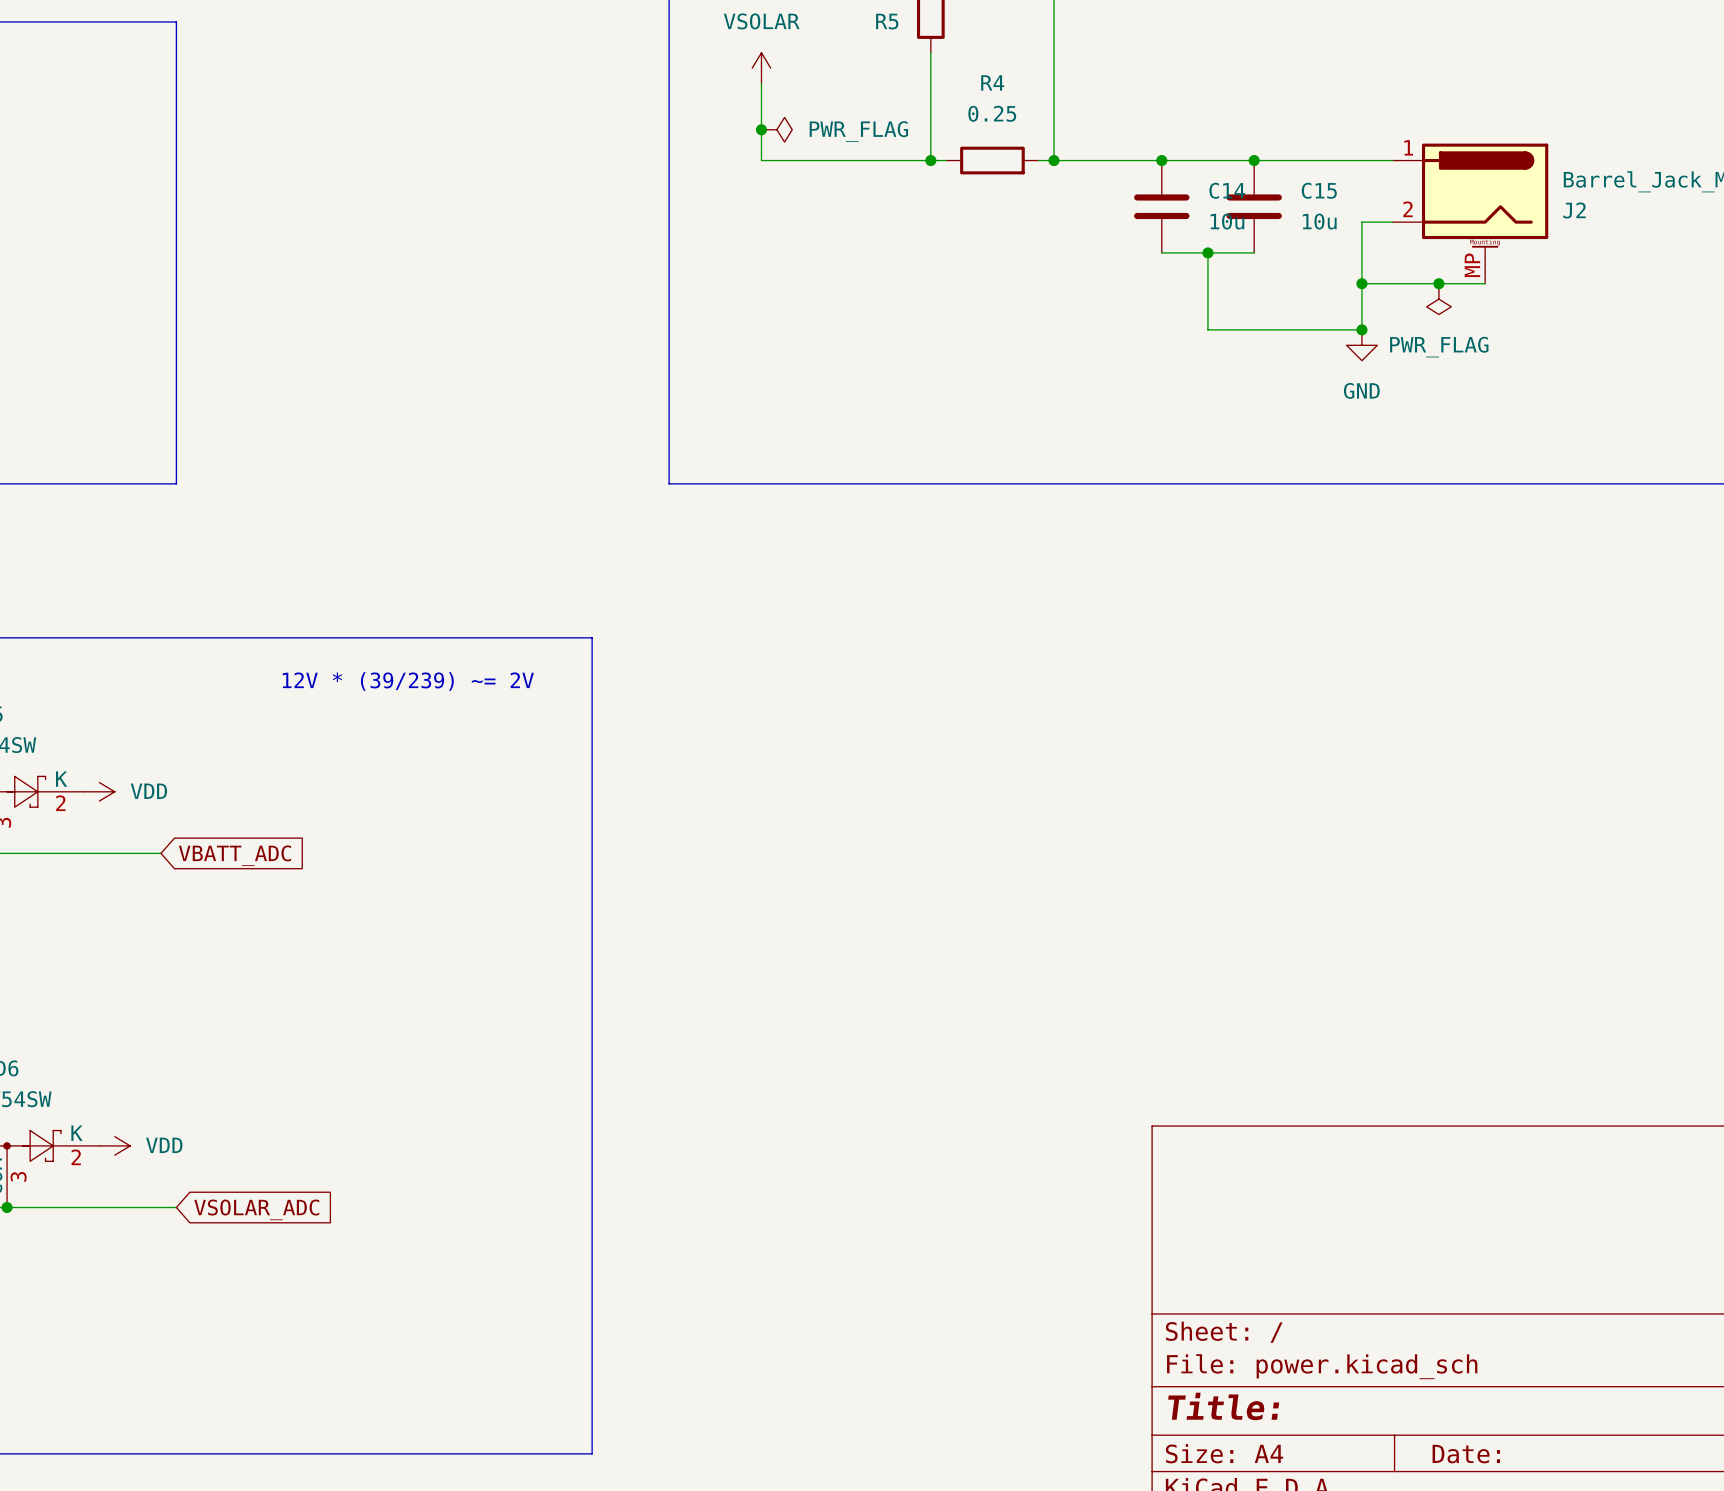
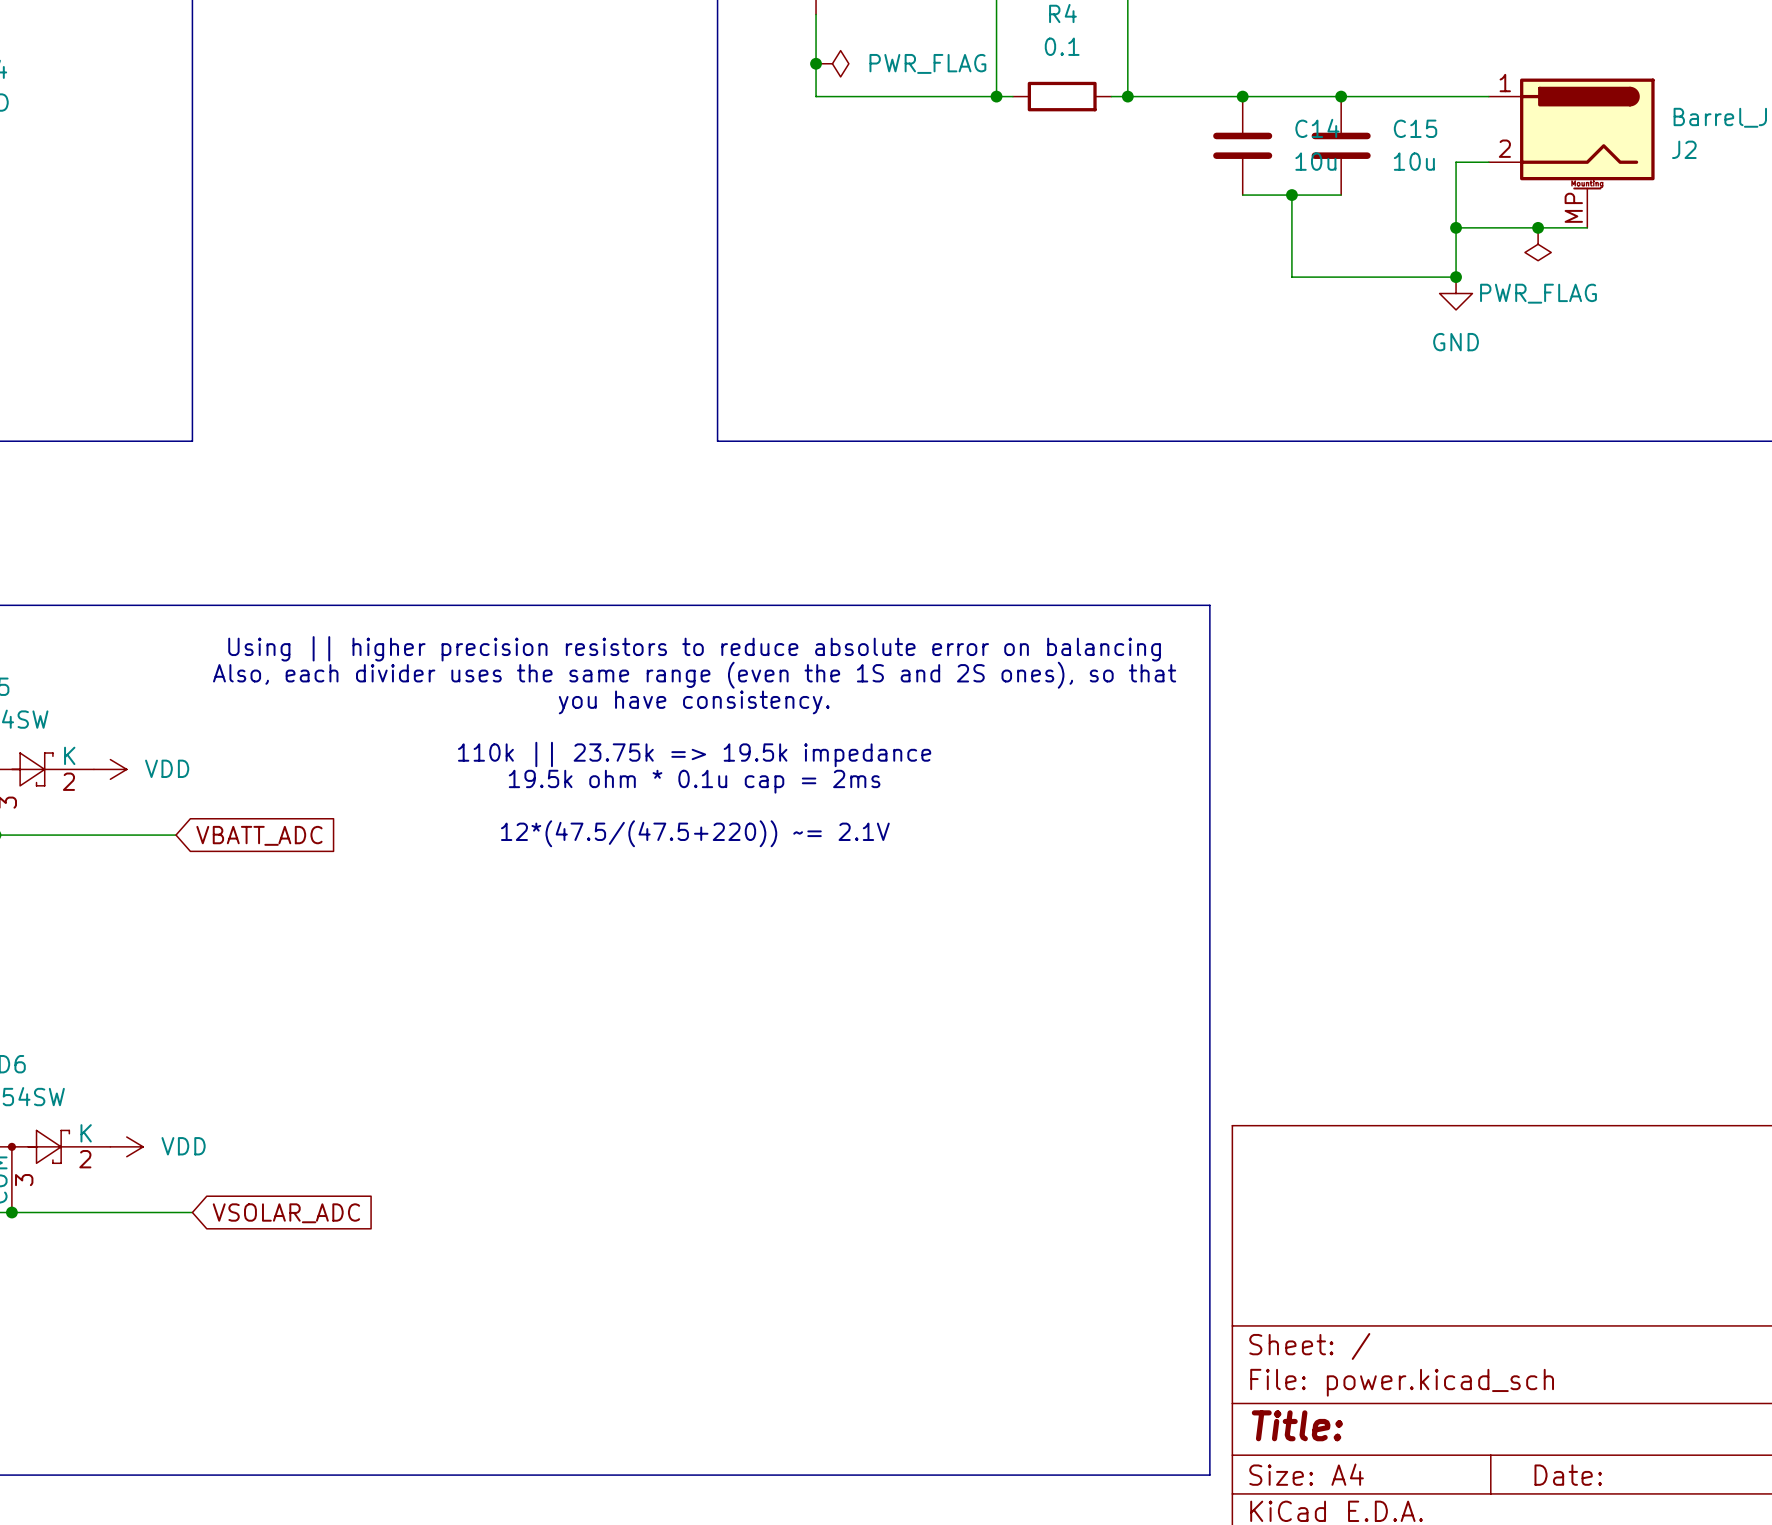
R4 value: 0.25 (992, 113) -> 0.1 (1062, 46)
line: (592, 637) (592, 1453) -> (635, 605) (1209, 605) (1209, 1475) (635, 1475)
text: none -> Using || higher precision resistors to reduce absolute error on balancing (694, 648)
text: 12V * (39/239) ~= 2V (408, 681) -> none
text: none -> Also, each divider uses the same range (even the 1S and 2S ones), so that (694, 675)
text: none -> you have consistency. (694, 702)
text: none -> 110k || 23.75k => 19.5k impedance (694, 754)
text: none -> 19.5k ohm * 0.1u cap = 2ms (694, 781)
text: none -> 12*(47.5/(47.5+220)) ~= 2.1V (695, 833)

